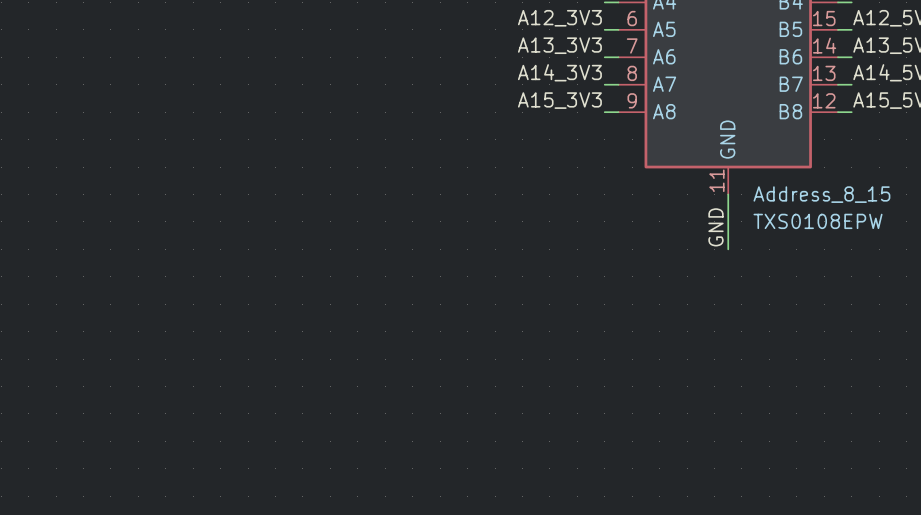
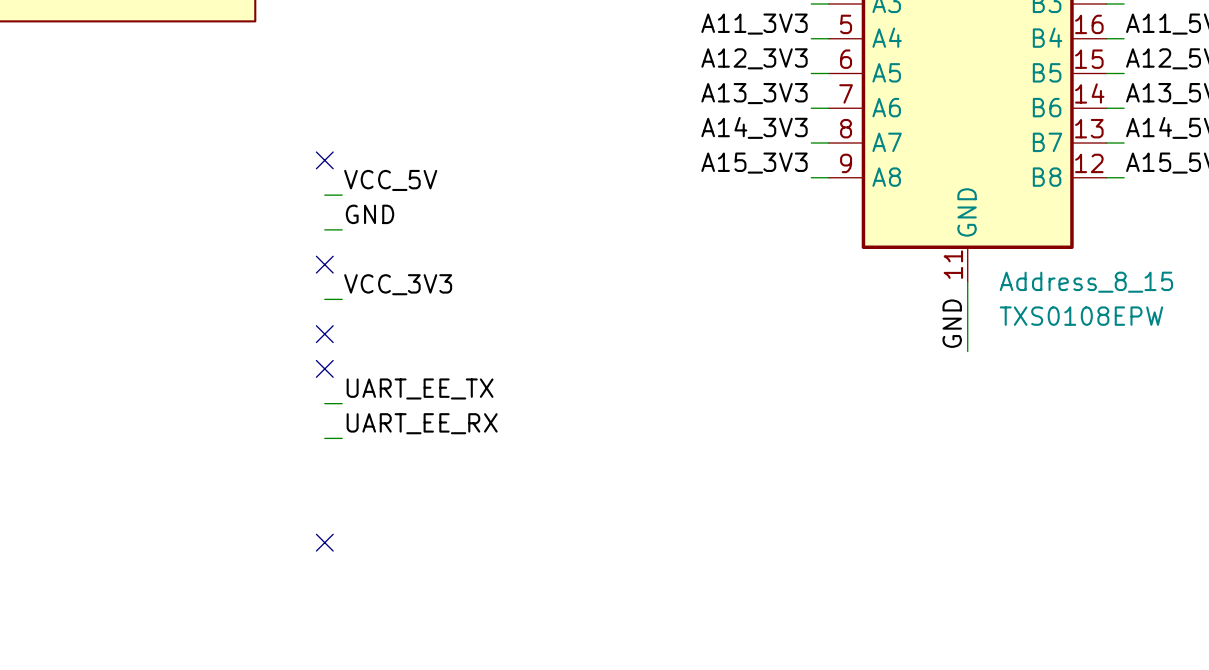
no-connect mark: none -> (324, 160)
label: none -> VCC_5V (390, 180)
wire: none -> (324, 195) (342, 195)
label: none -> GND (370, 214)
wire: none -> (324, 229) (342, 229)
no-connect mark: none -> (324, 264)
label: none -> VCC_3V3 (398, 284)
wire: none -> (324, 299) (342, 299)
no-connect mark: none -> (324, 334)
no-connect mark: none -> (324, 368)
label: none -> UART_EE_TX (420, 388)
wire: none -> (324, 403) (342, 403)
label: none -> UART_EE_RX (422, 423)
wire: none -> (324, 438) (342, 438)
no-connect mark: none -> (324, 542)

